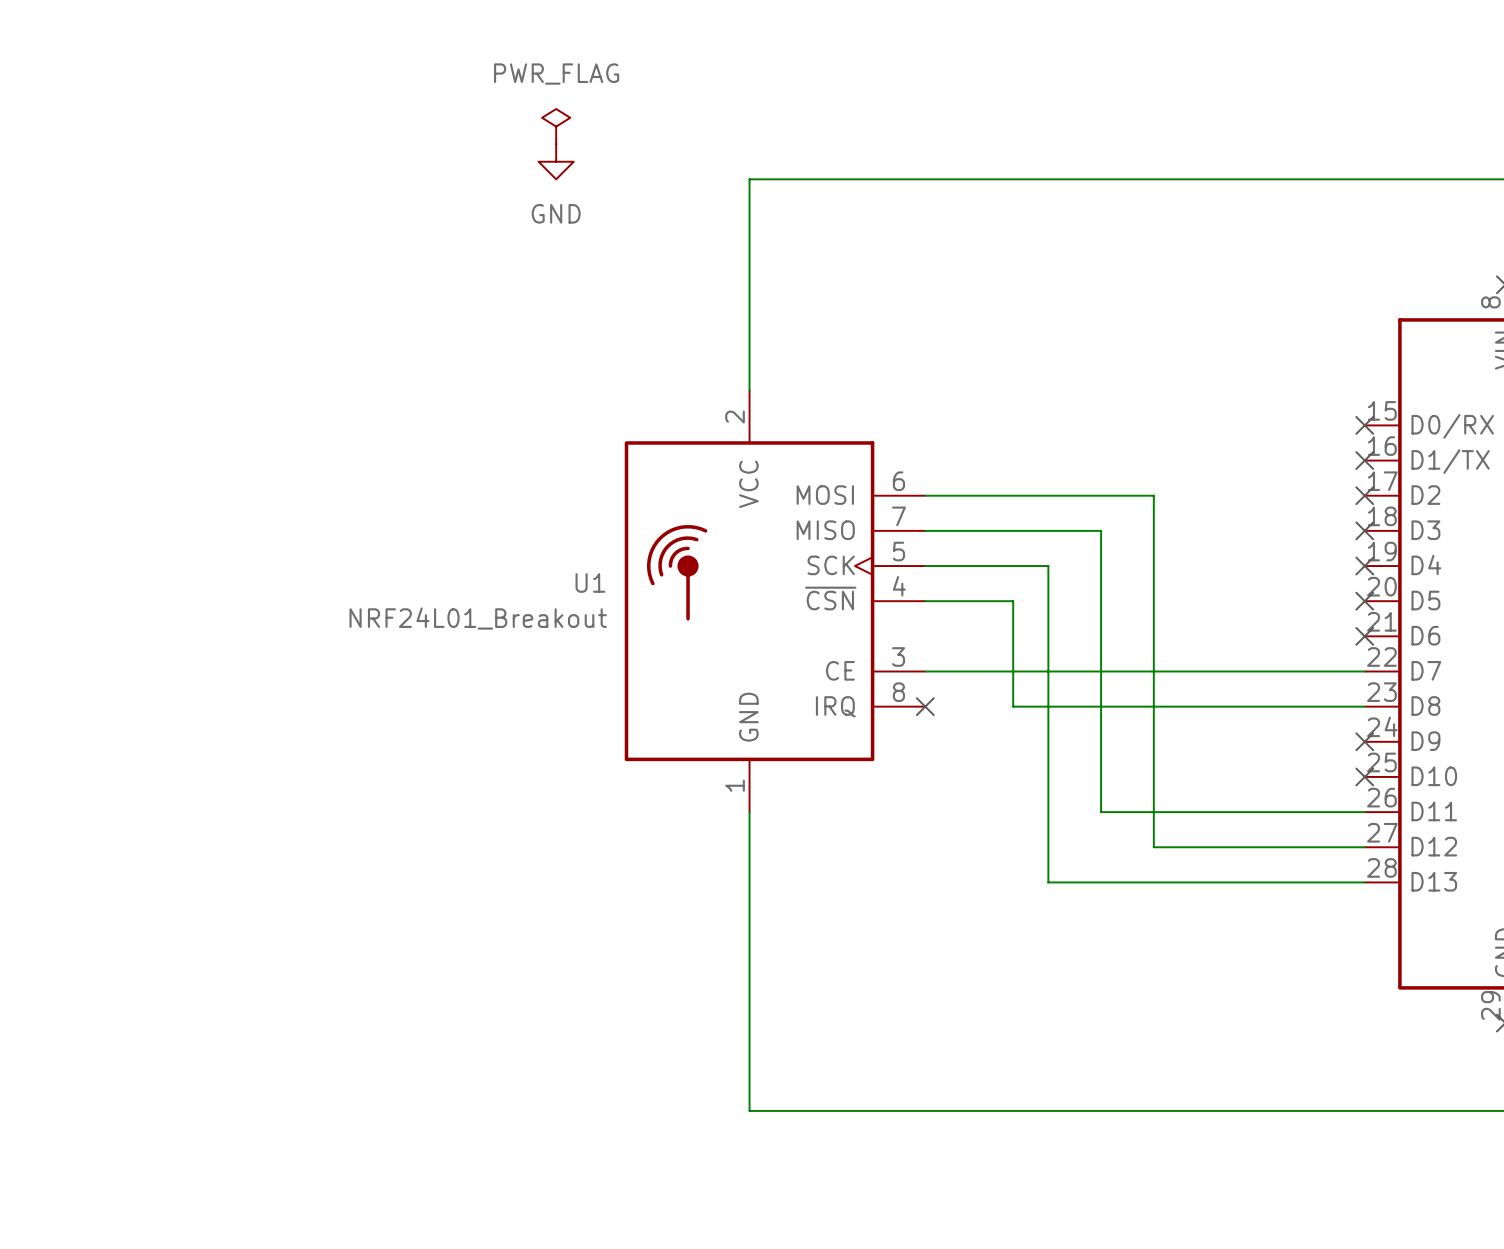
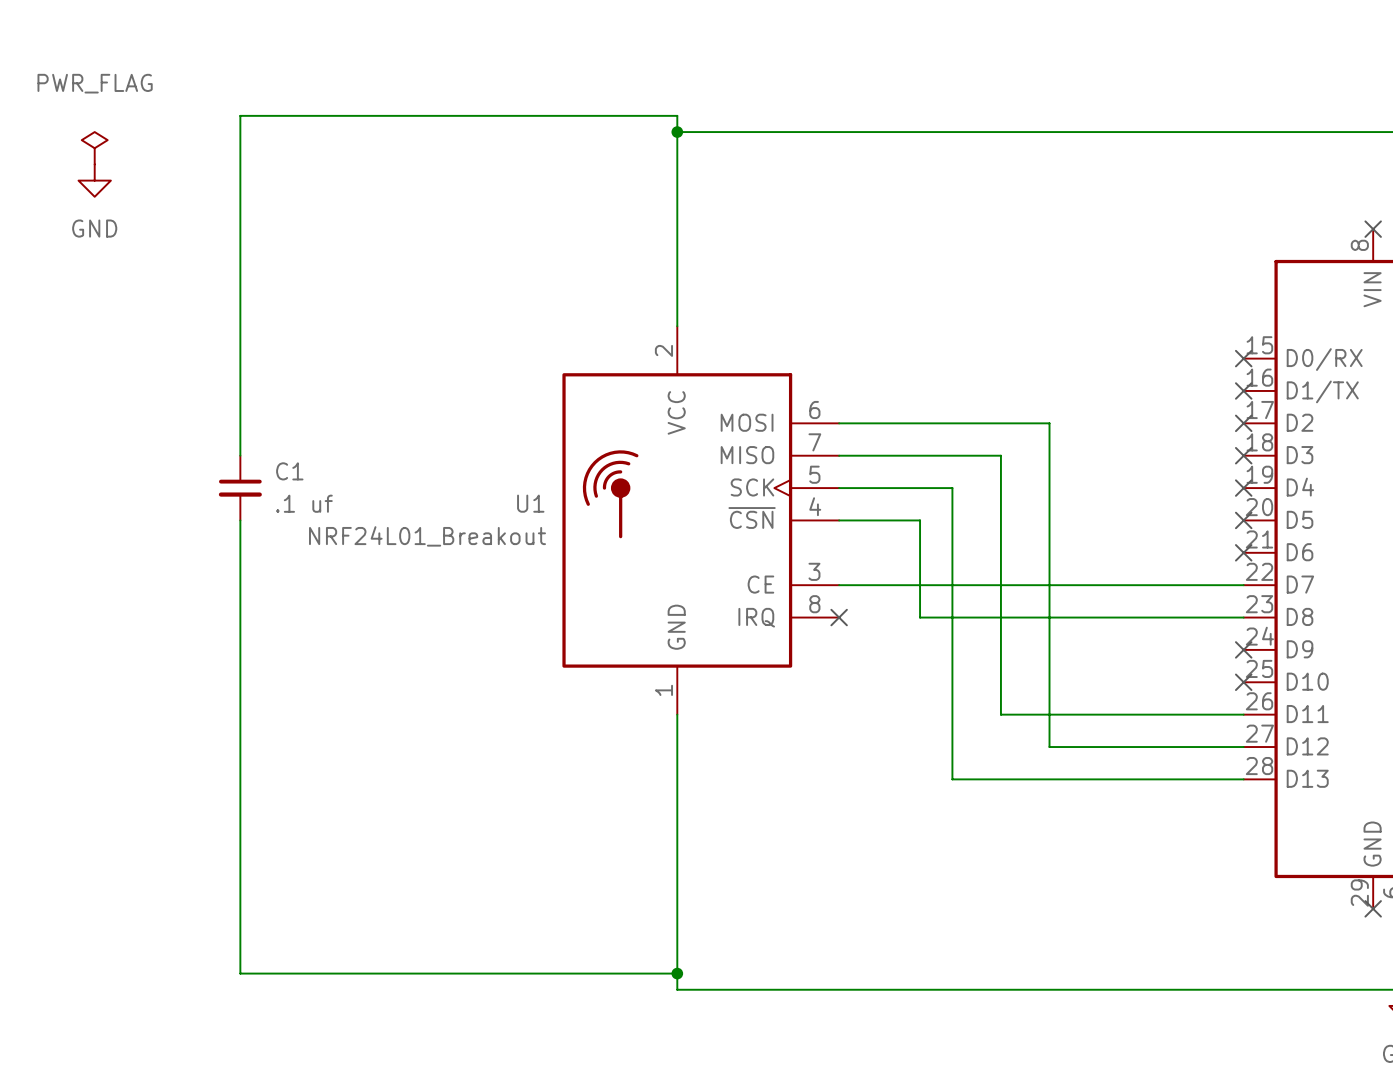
power symbol: PWR_FLAG (556, 126) -> none
power symbol: GND (556, 161) -> none
wire: none -> (677, 132) (677, 115) (240, 115) (240, 455)
junction: none -> (677, 132)
power symbol: none -> PWR_FLAG (94, 148)
power symbol: none -> GND (94, 180)
C1: none -> .1 uf (240, 488)
wire: none -> (240, 520) (240, 973) (677, 973)
junction: none -> (677, 973)

